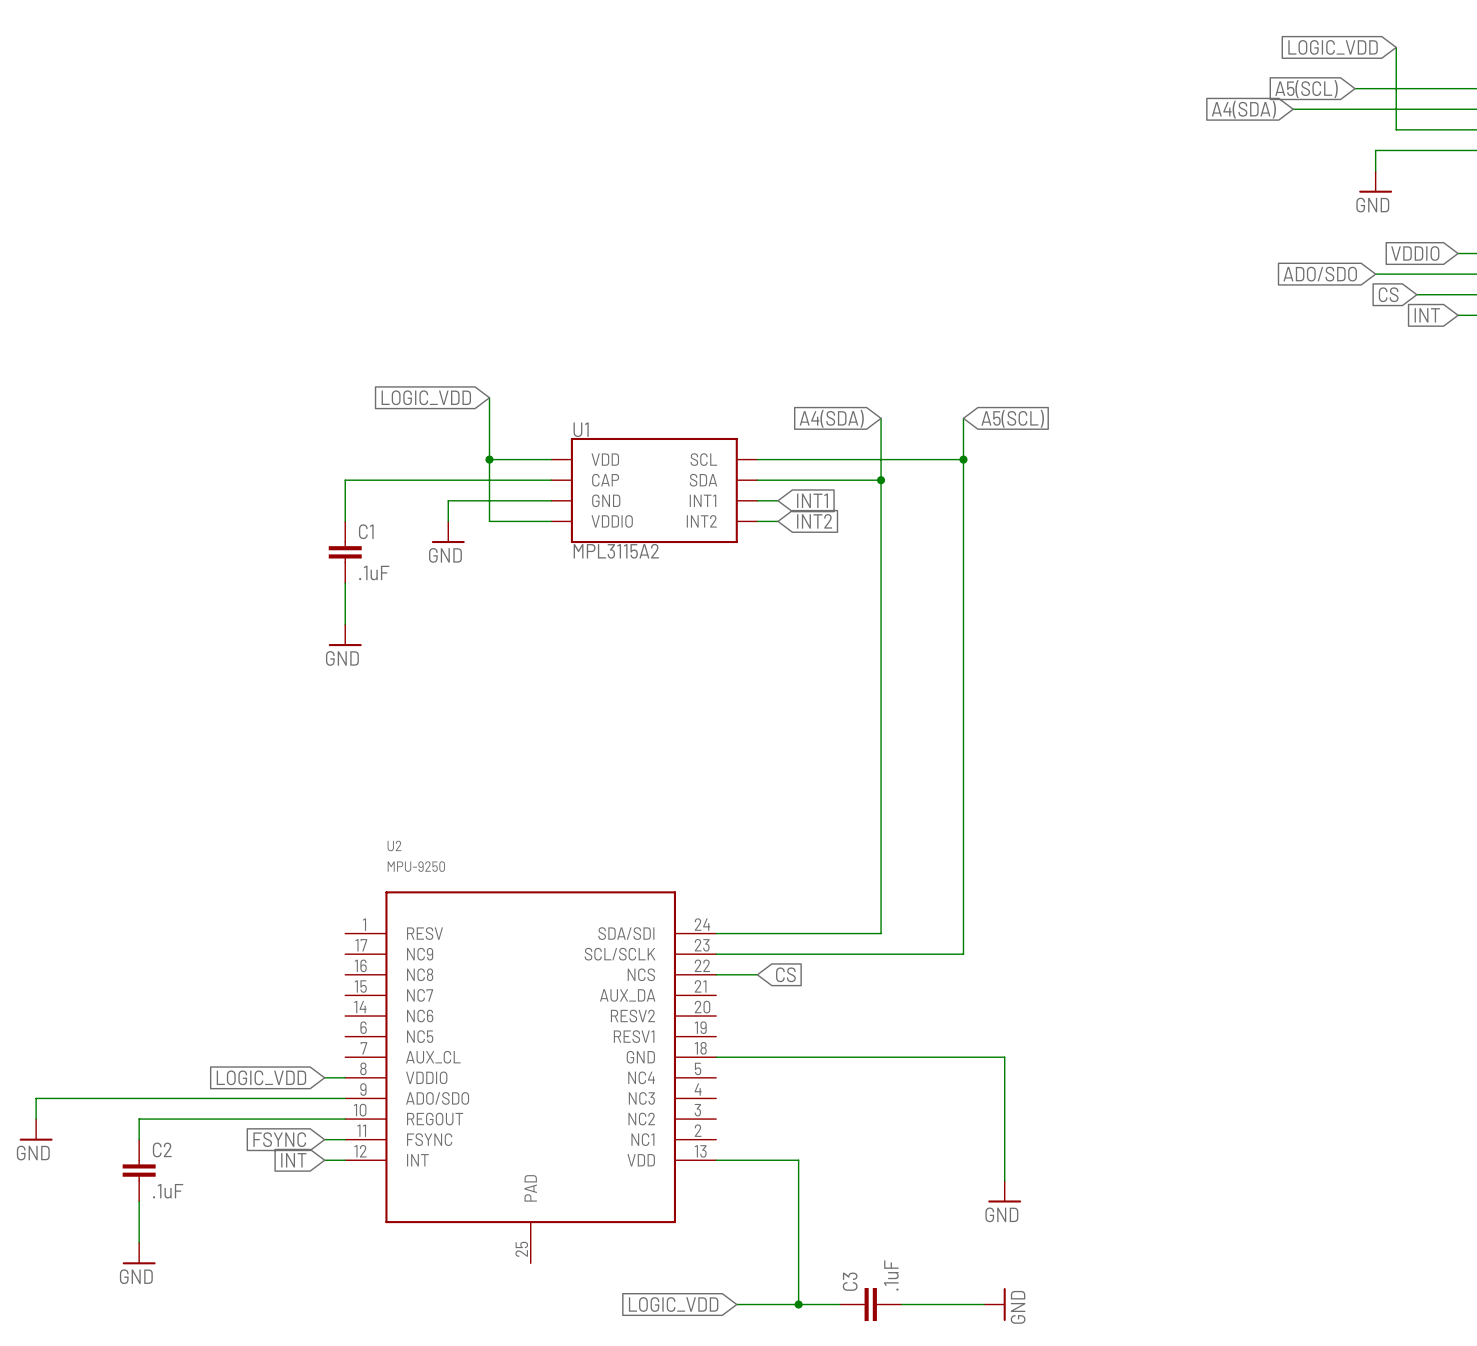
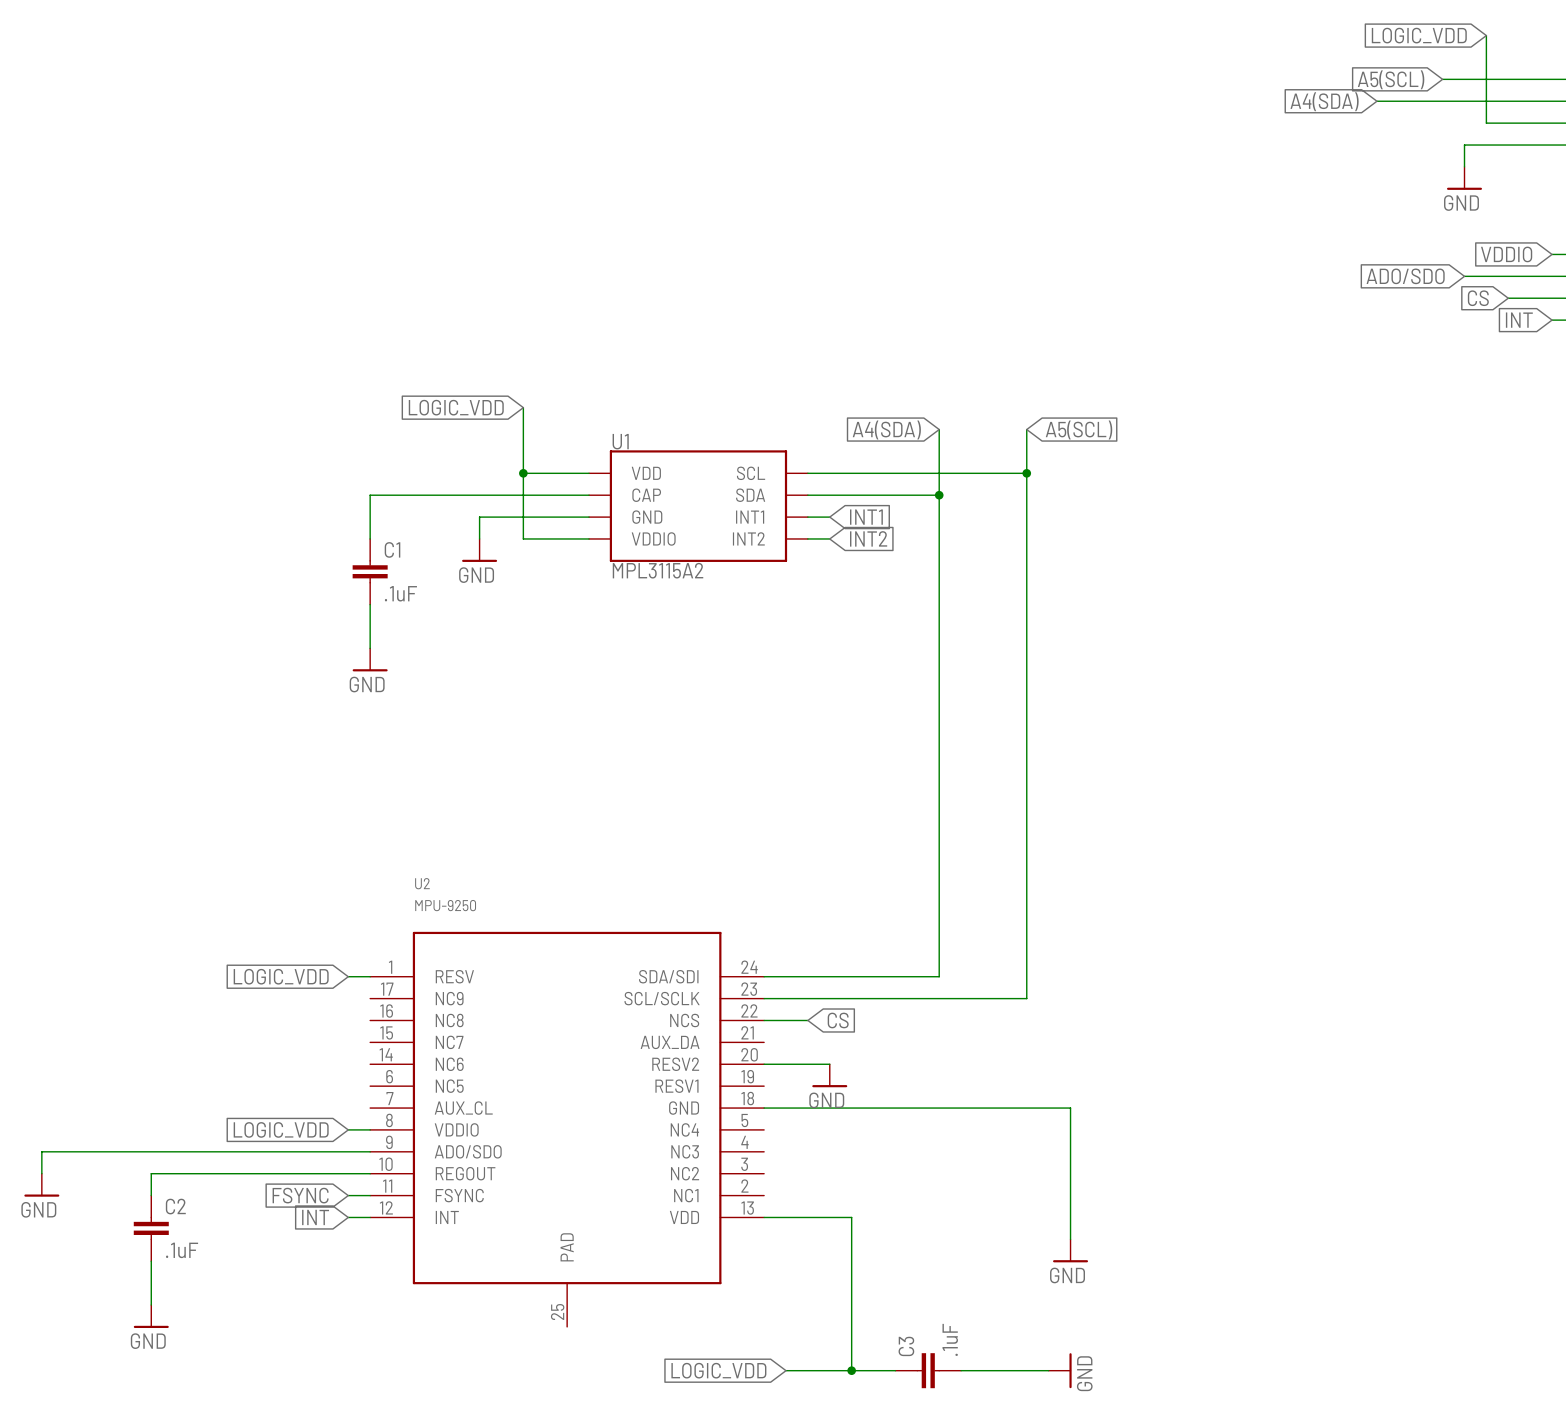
global label: none -> LOGIC_VDD (281, 976)
wire: none -> (348, 976) (370, 976)
wire: none -> (764, 1064) (829, 1064)
power symbol: none -> GND (829, 1075)

